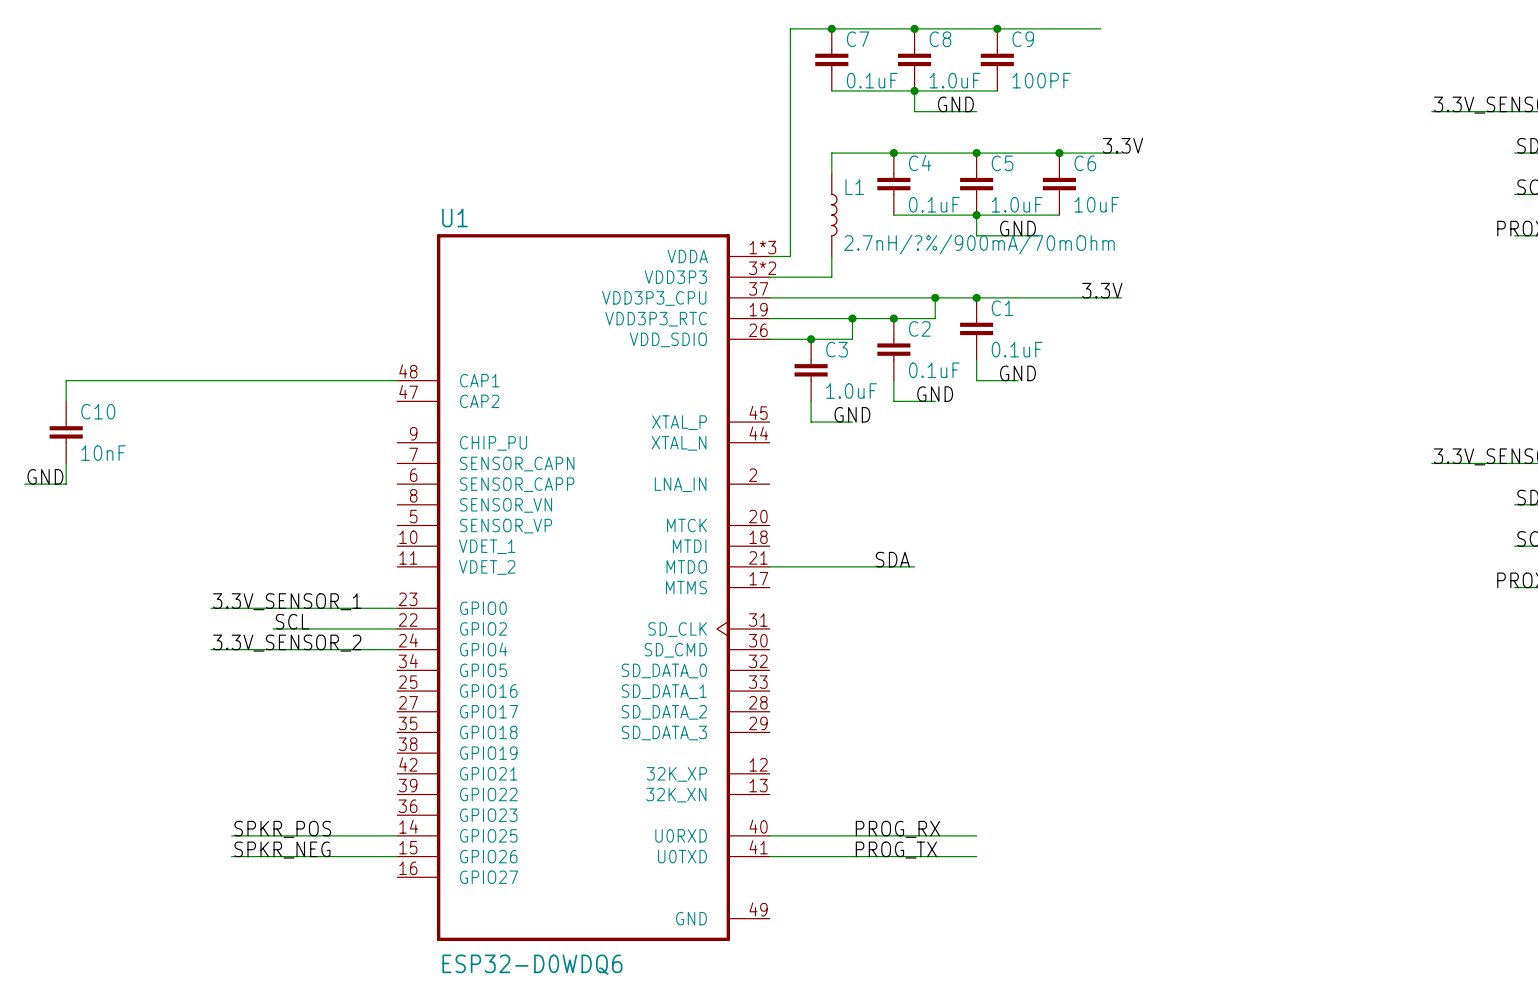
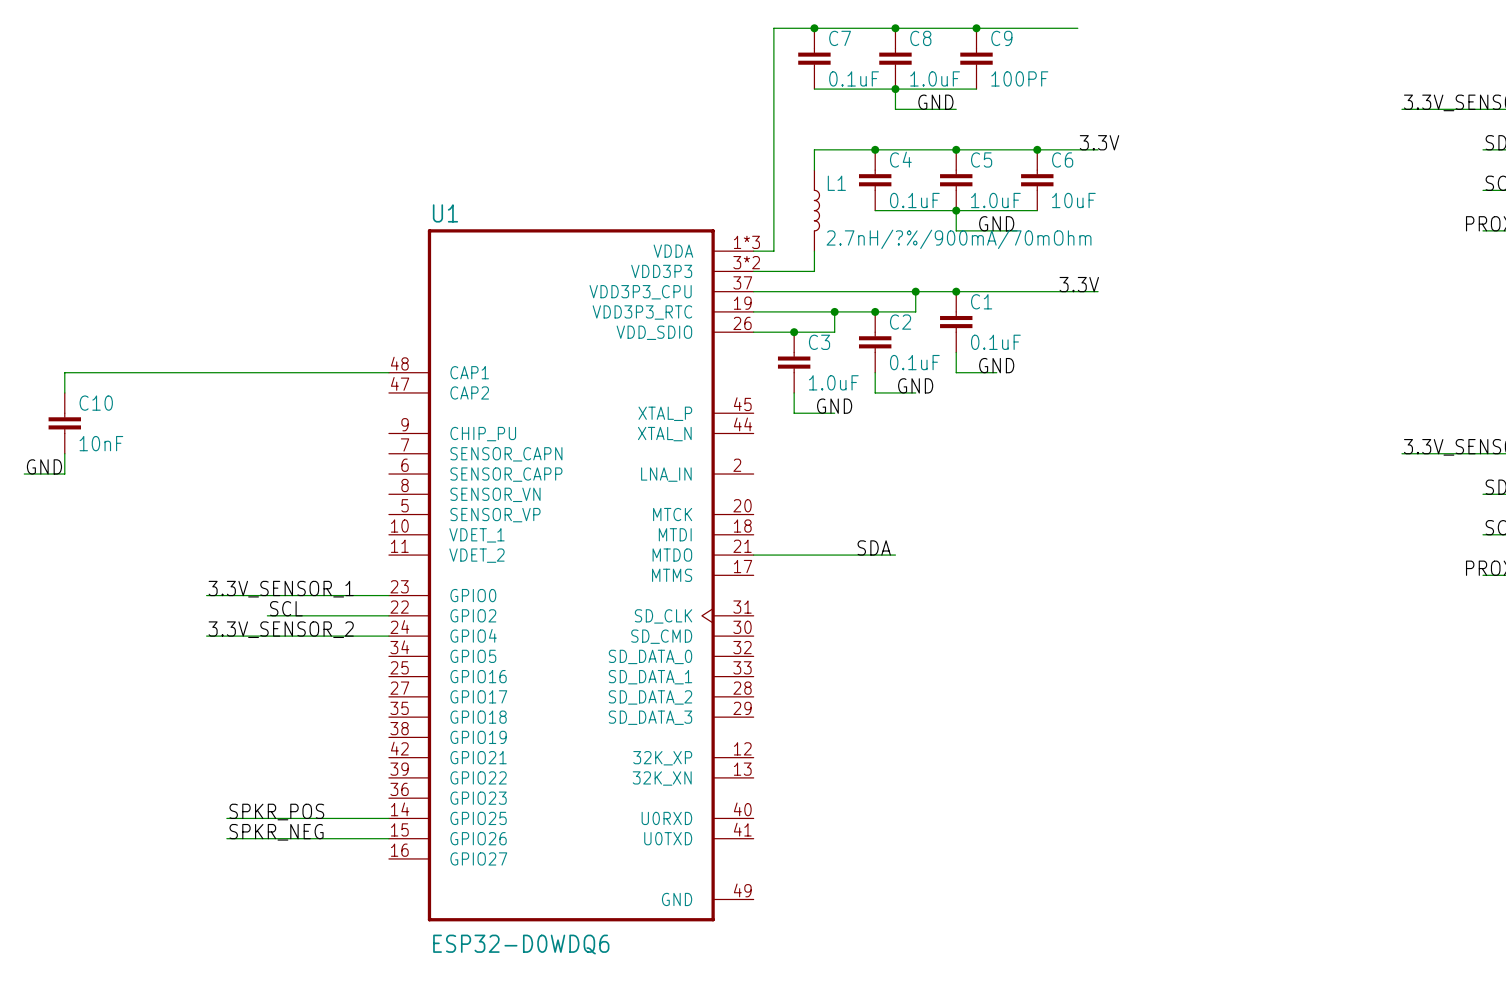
label: PROG_RX (897, 829) -> none
wire: (769, 835) (976, 835) -> none
label: PROG_TX (896, 850) -> none
wire: (769, 856) (976, 856) -> none

